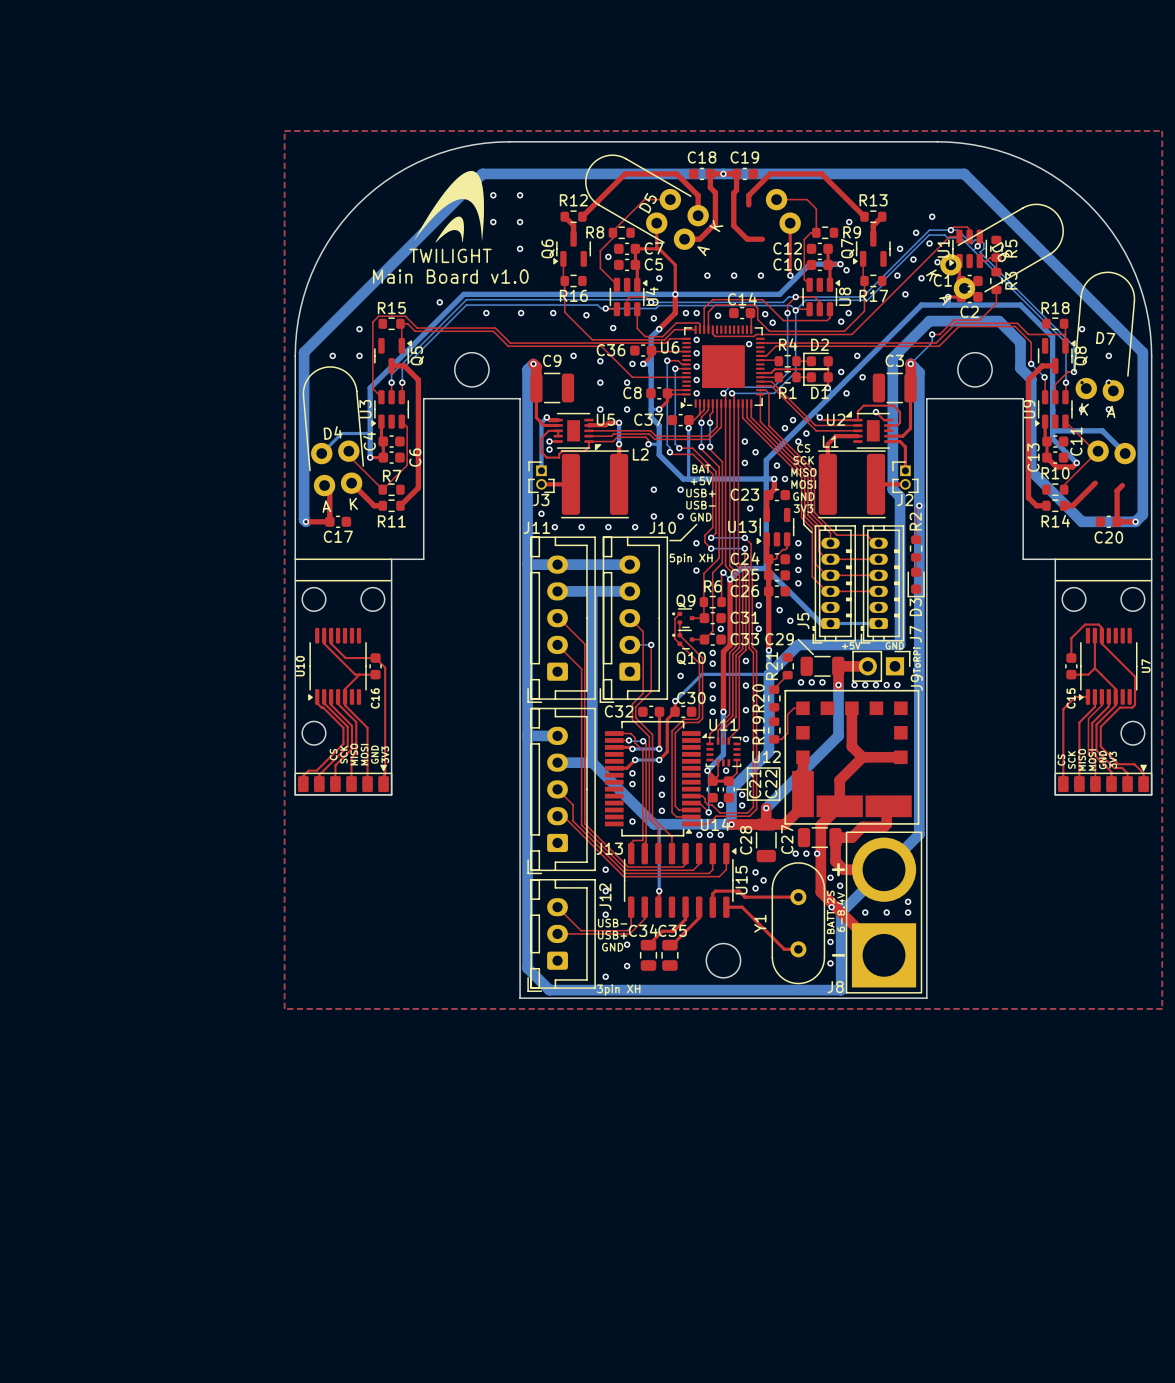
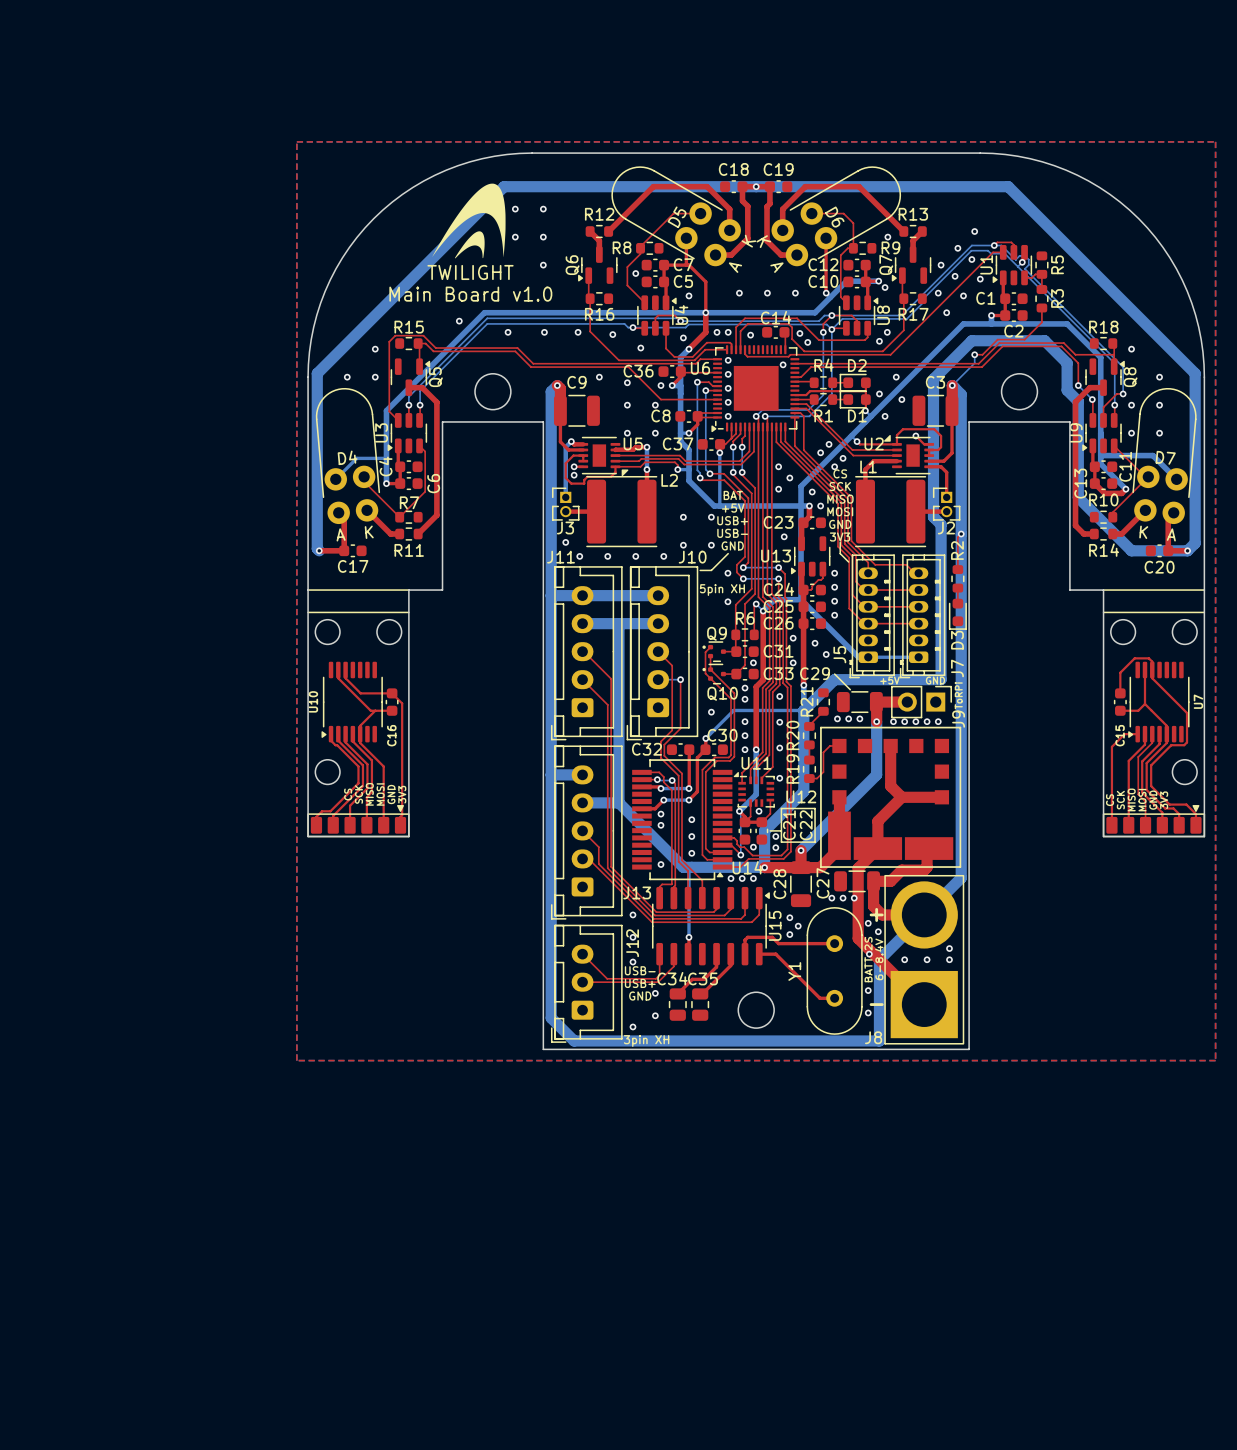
D6 position: (1002, 251) -> (836, 216)
D7 position: (1104, 336) -> (1164, 456)

